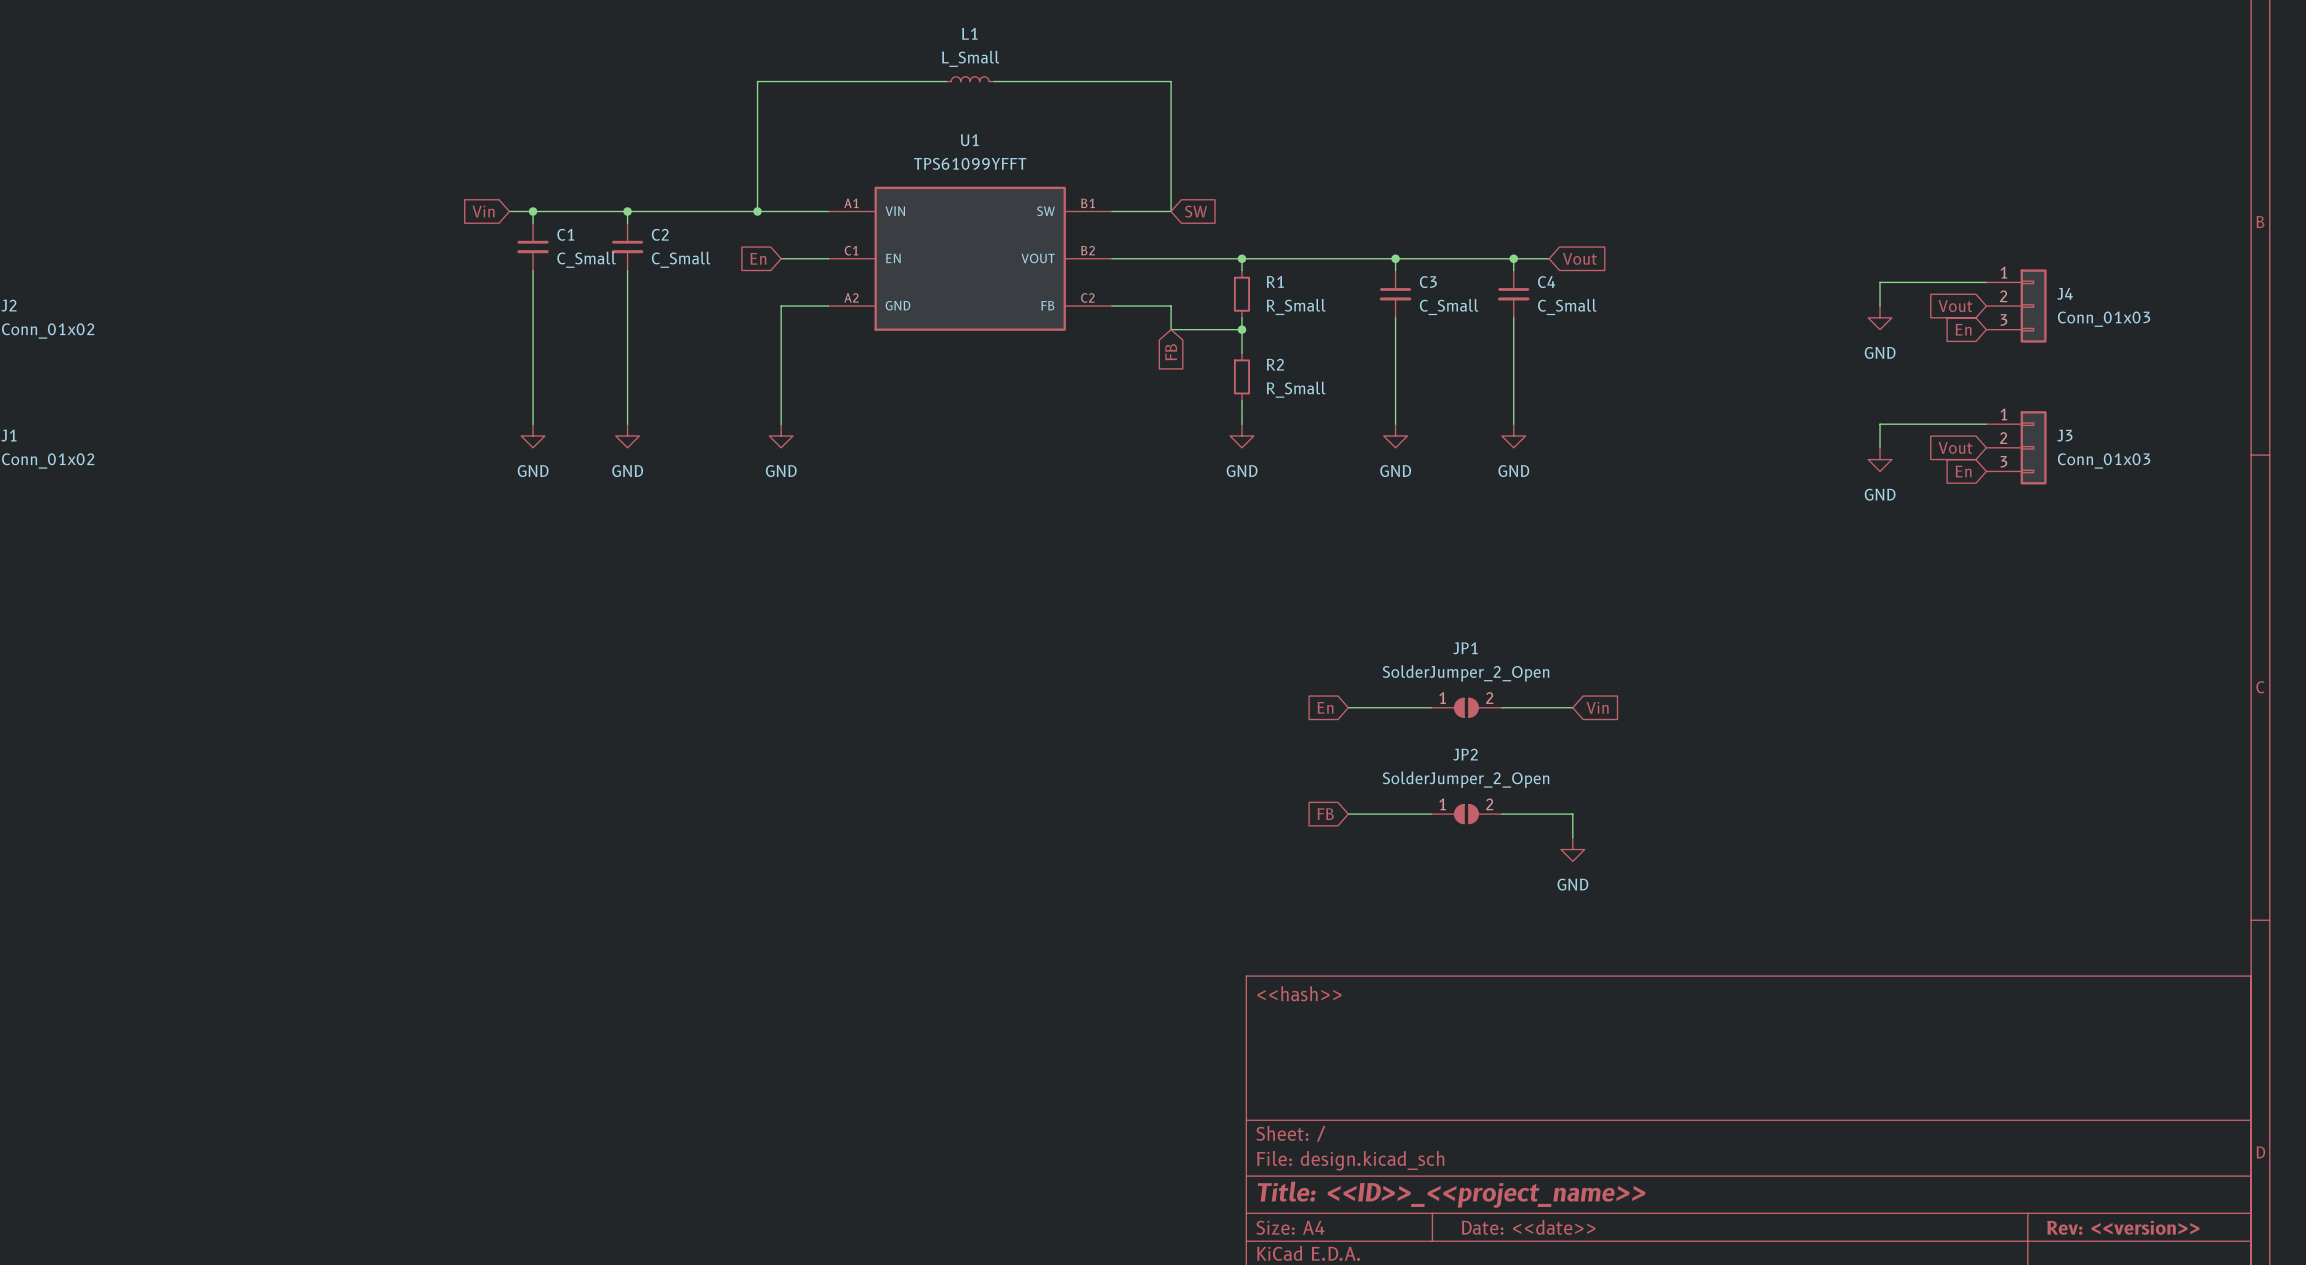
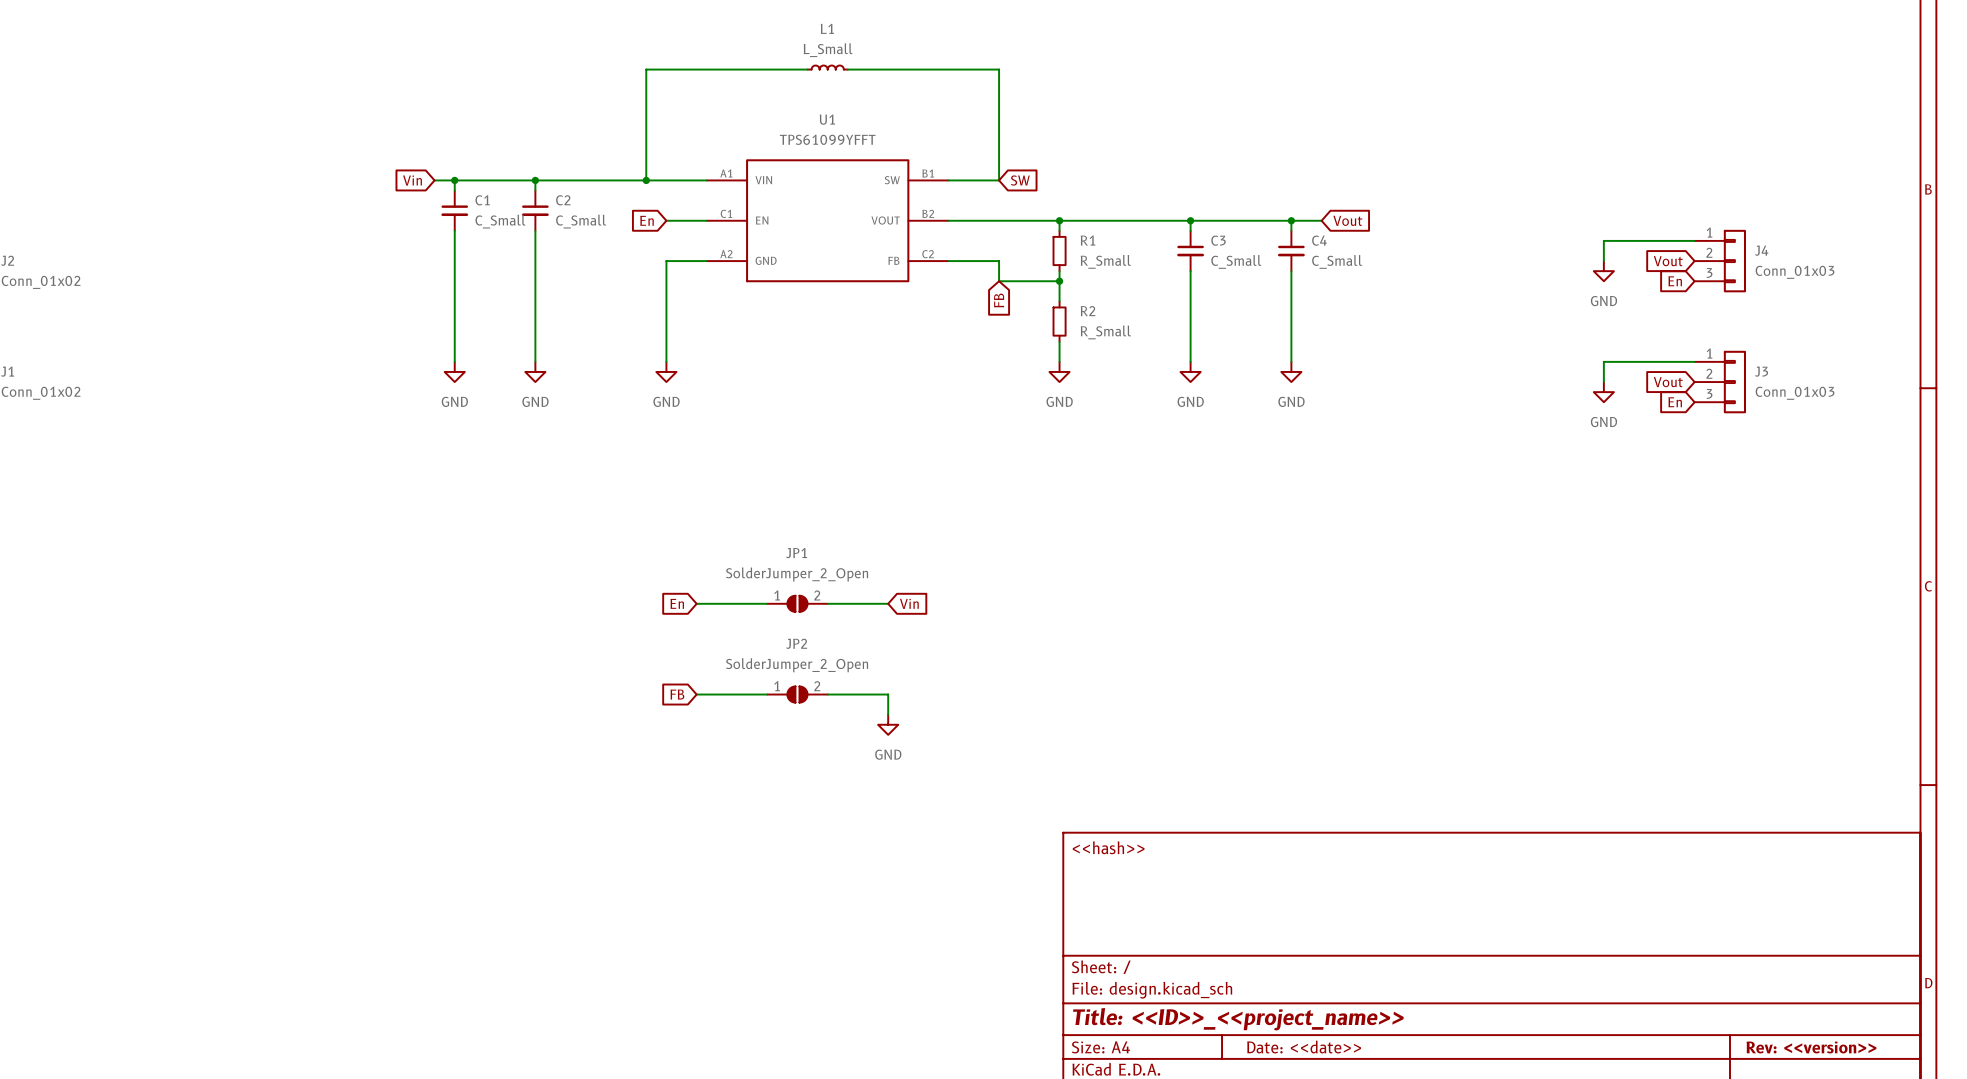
global label: none -> En (677, 603)
wire: none -> (696, 603) (767, 603)
wire: none -> (827, 603) (888, 603)
global label: none -> Vin (909, 603)
global label: En (1325, 707) -> none
wire: (1348, 707) (1431, 707) -> none
JP1 position: (1466, 707) -> (797, 603)
wire: (1501, 707) (1572, 707) -> none
global label: Vin (1597, 707) -> none
global label: none -> FB (677, 694)
wire: none -> (696, 694) (767, 694)
wire: none -> (827, 694) (888, 694) (888, 714)
global label: FB (1325, 814) -> none
wire: (1348, 814) (1431, 814) -> none
JP2 position: (1466, 814) -> (797, 694)
wire: (1501, 814) (1572, 814) (1572, 837) -> none
power symbol: none -> GND (888, 724)
power symbol: GND (1572, 849) -> none

